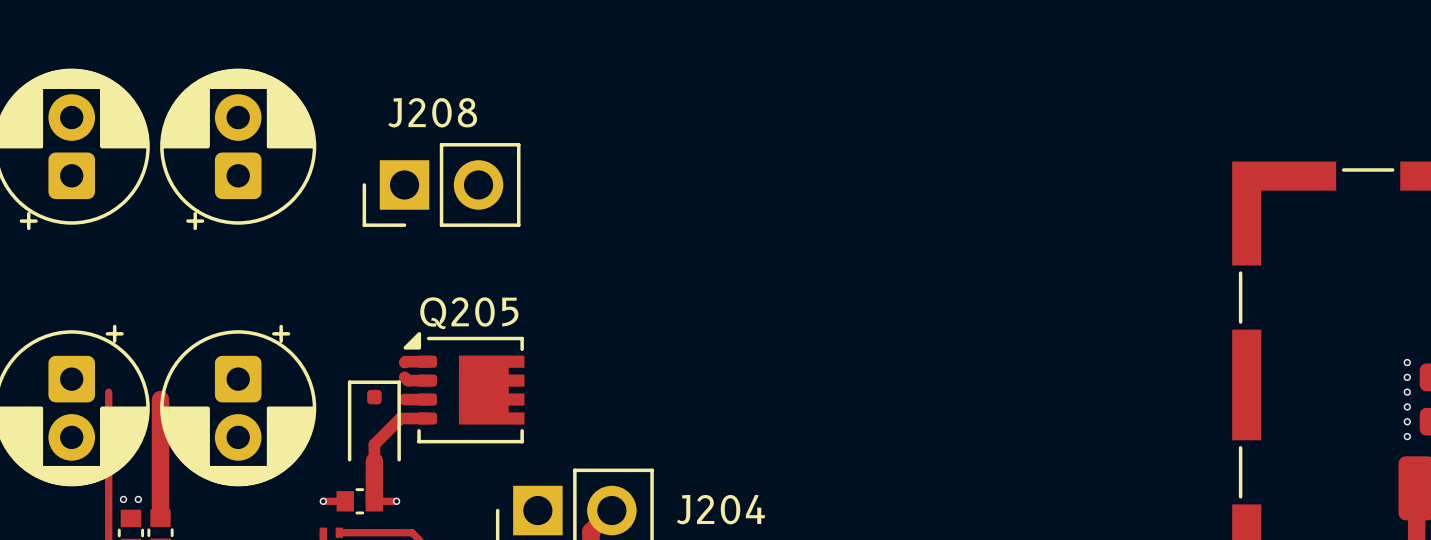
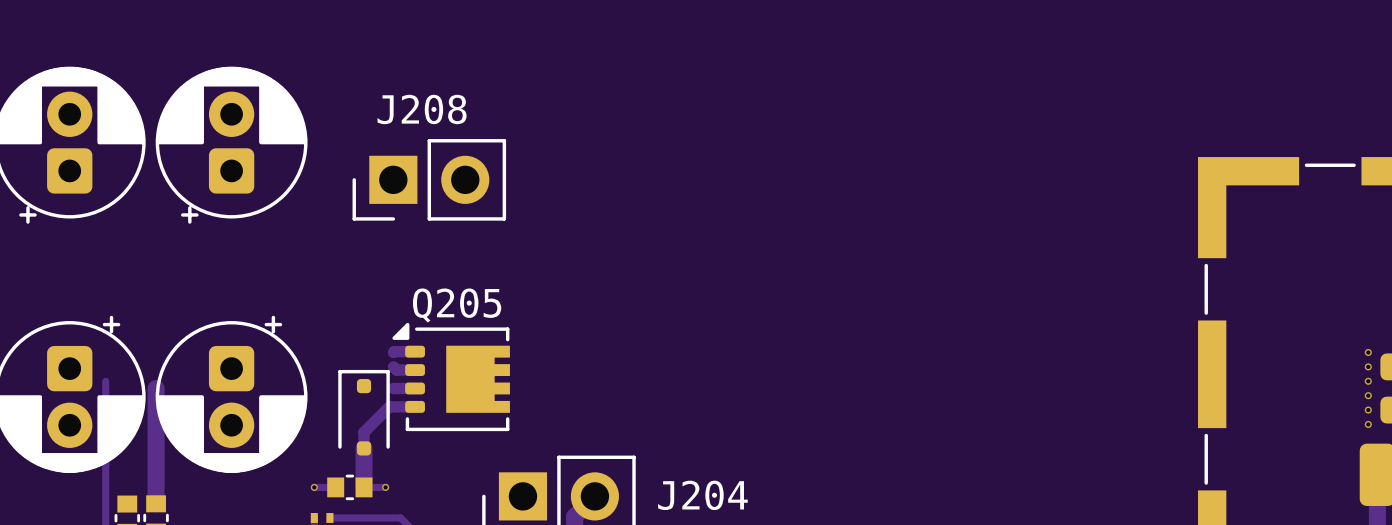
via: (123, 499) -> none
via: (138, 499) -> none

